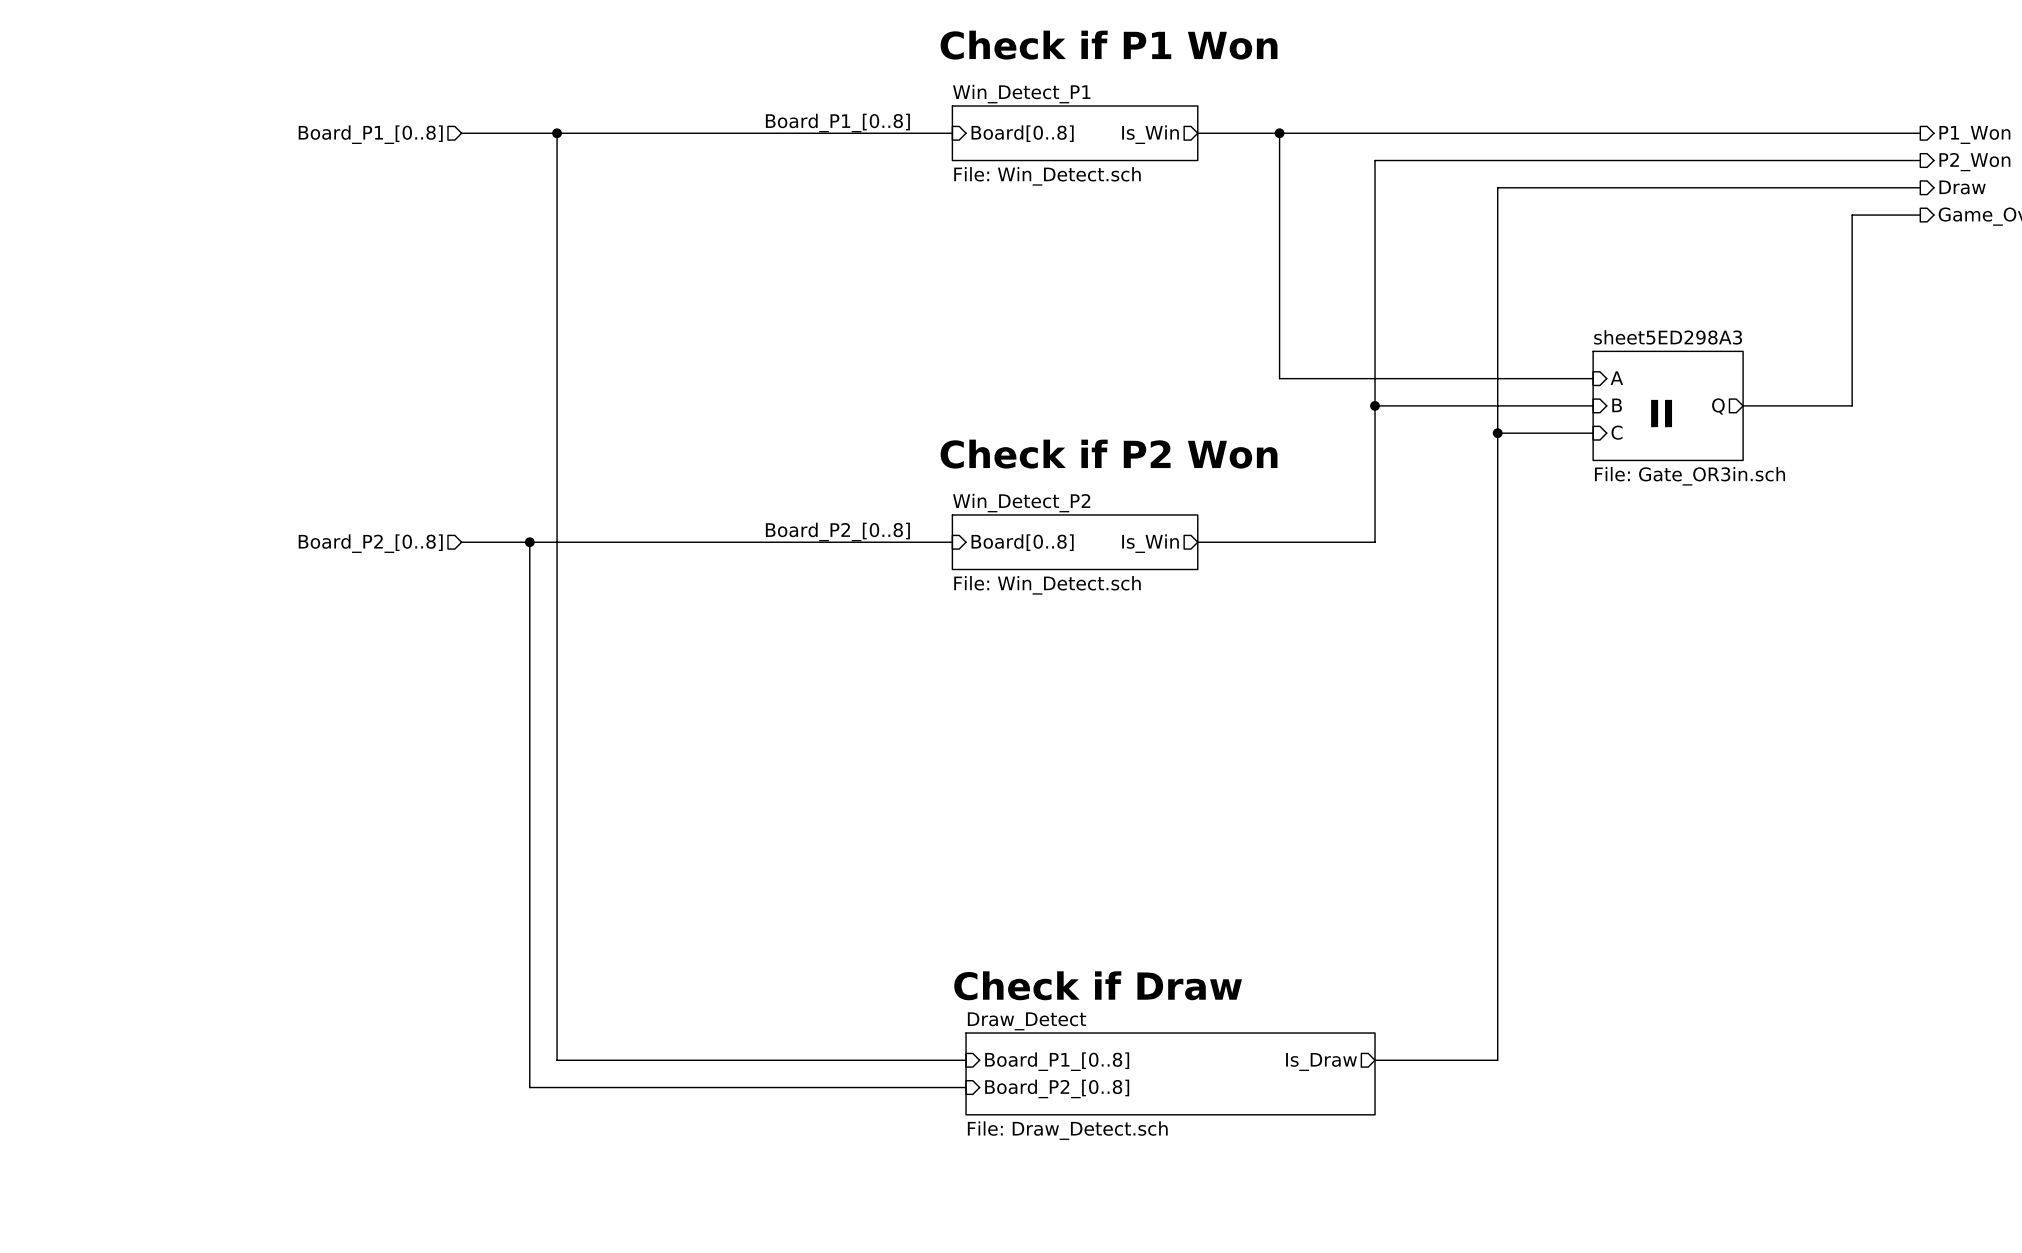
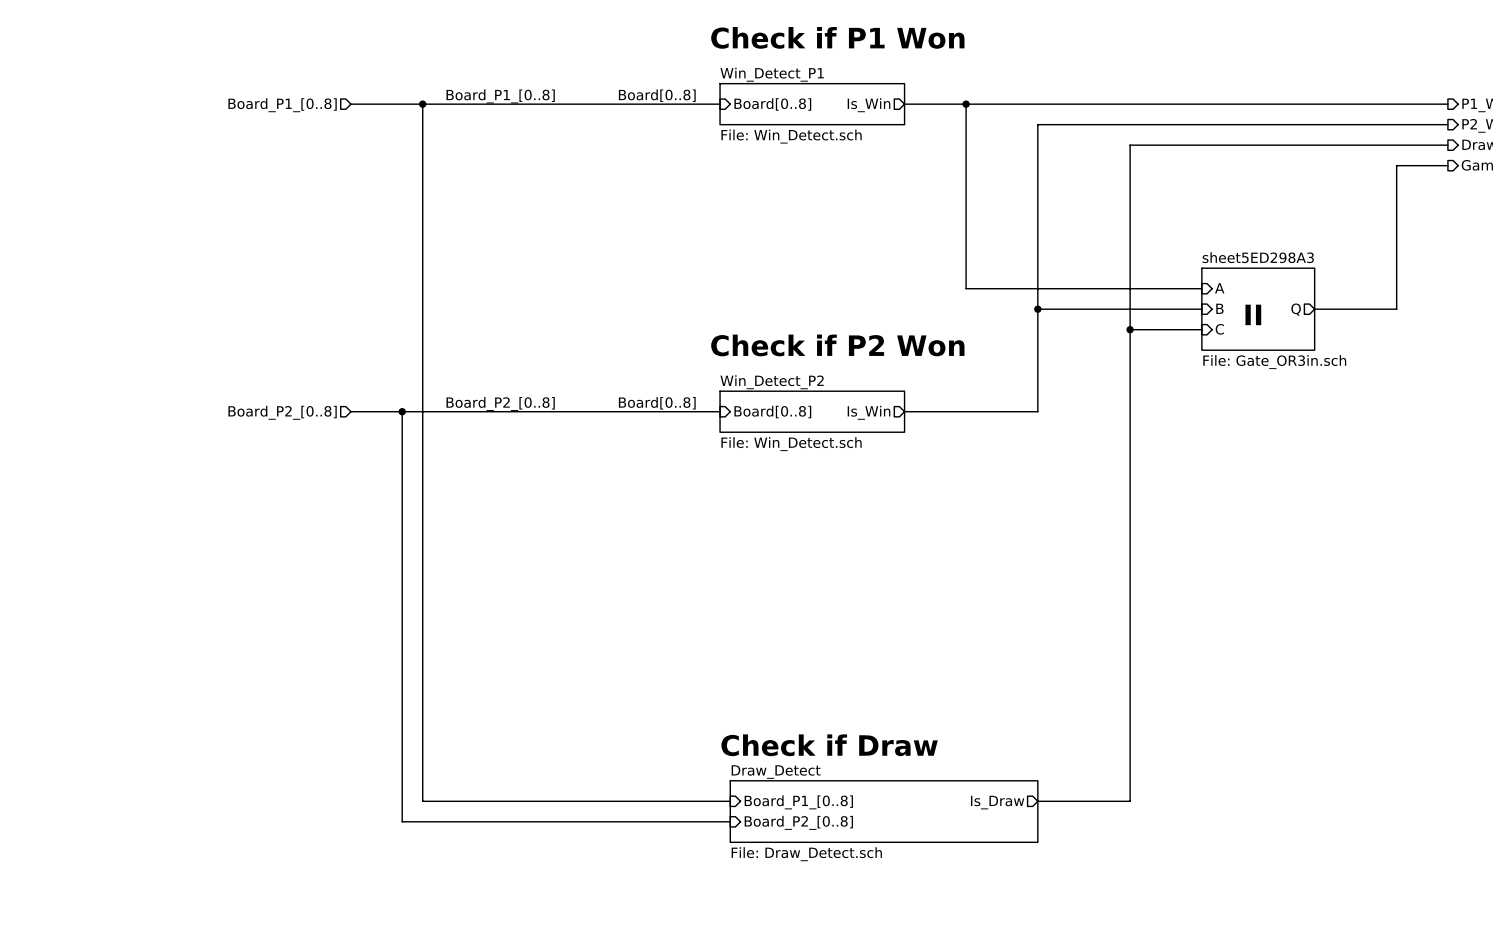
label: none -> Board[0..8] (657, 95)
label position: Board_P1_[0..8] (837, 123) -> Board_P1_[0..8] (500, 96)
label position: Board_P2_[0..8] (837, 531) -> Board_P2_[0..8] (500, 404)
label: none -> Board[0..8] (657, 403)

